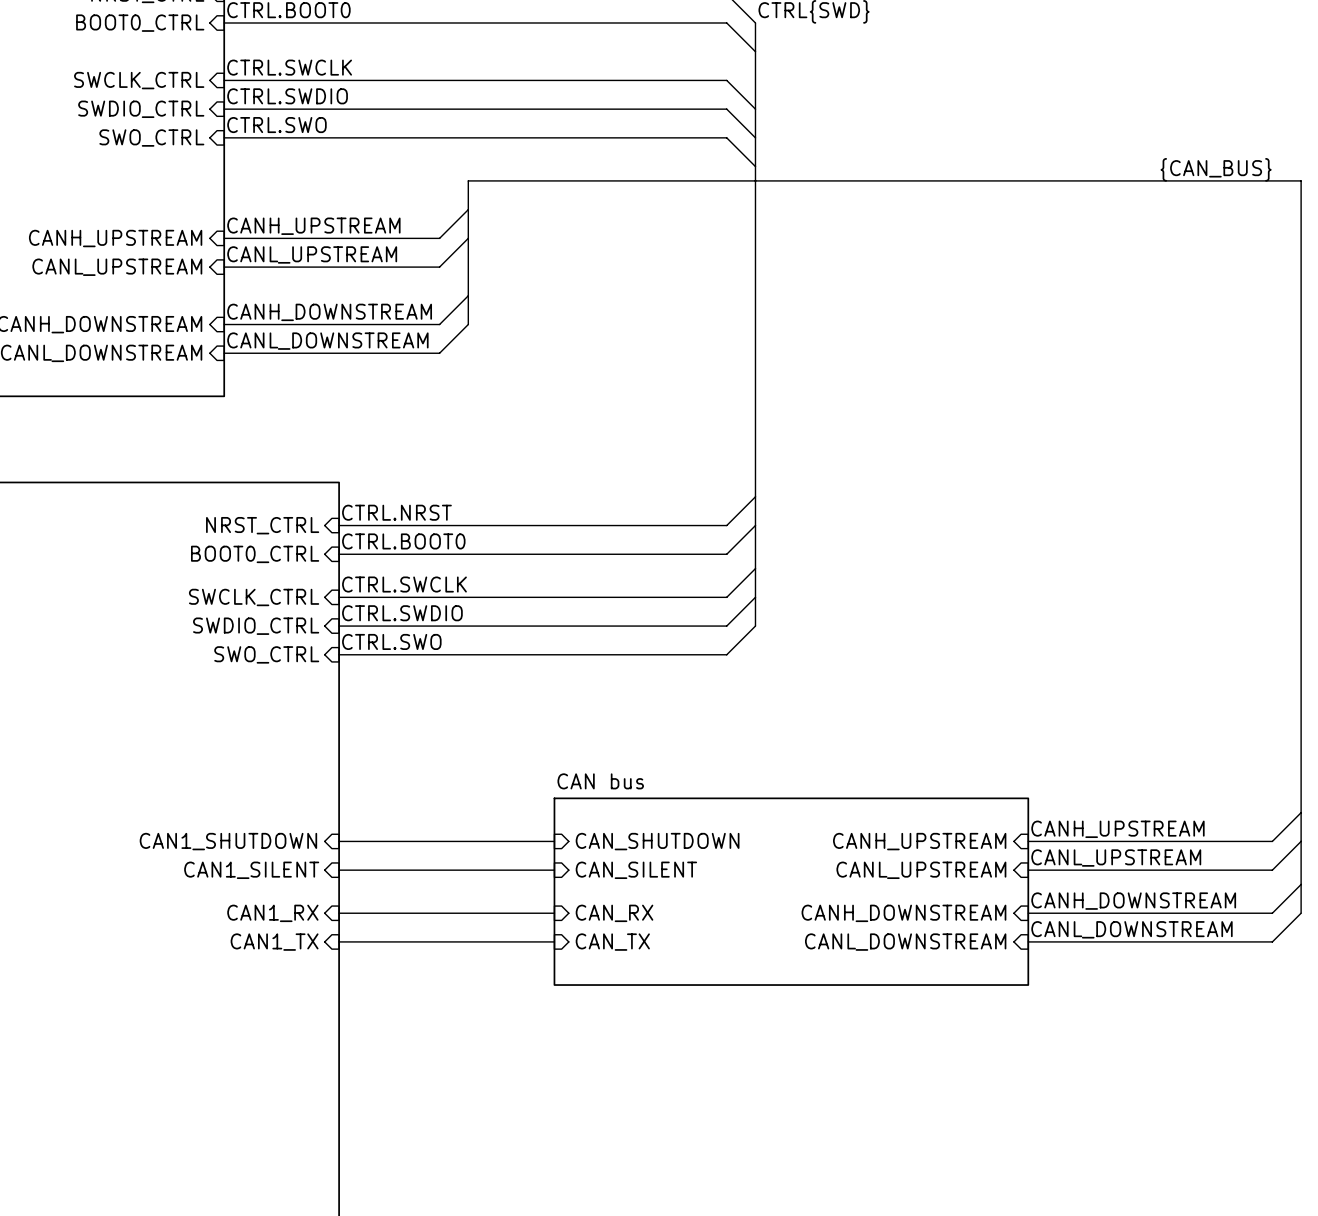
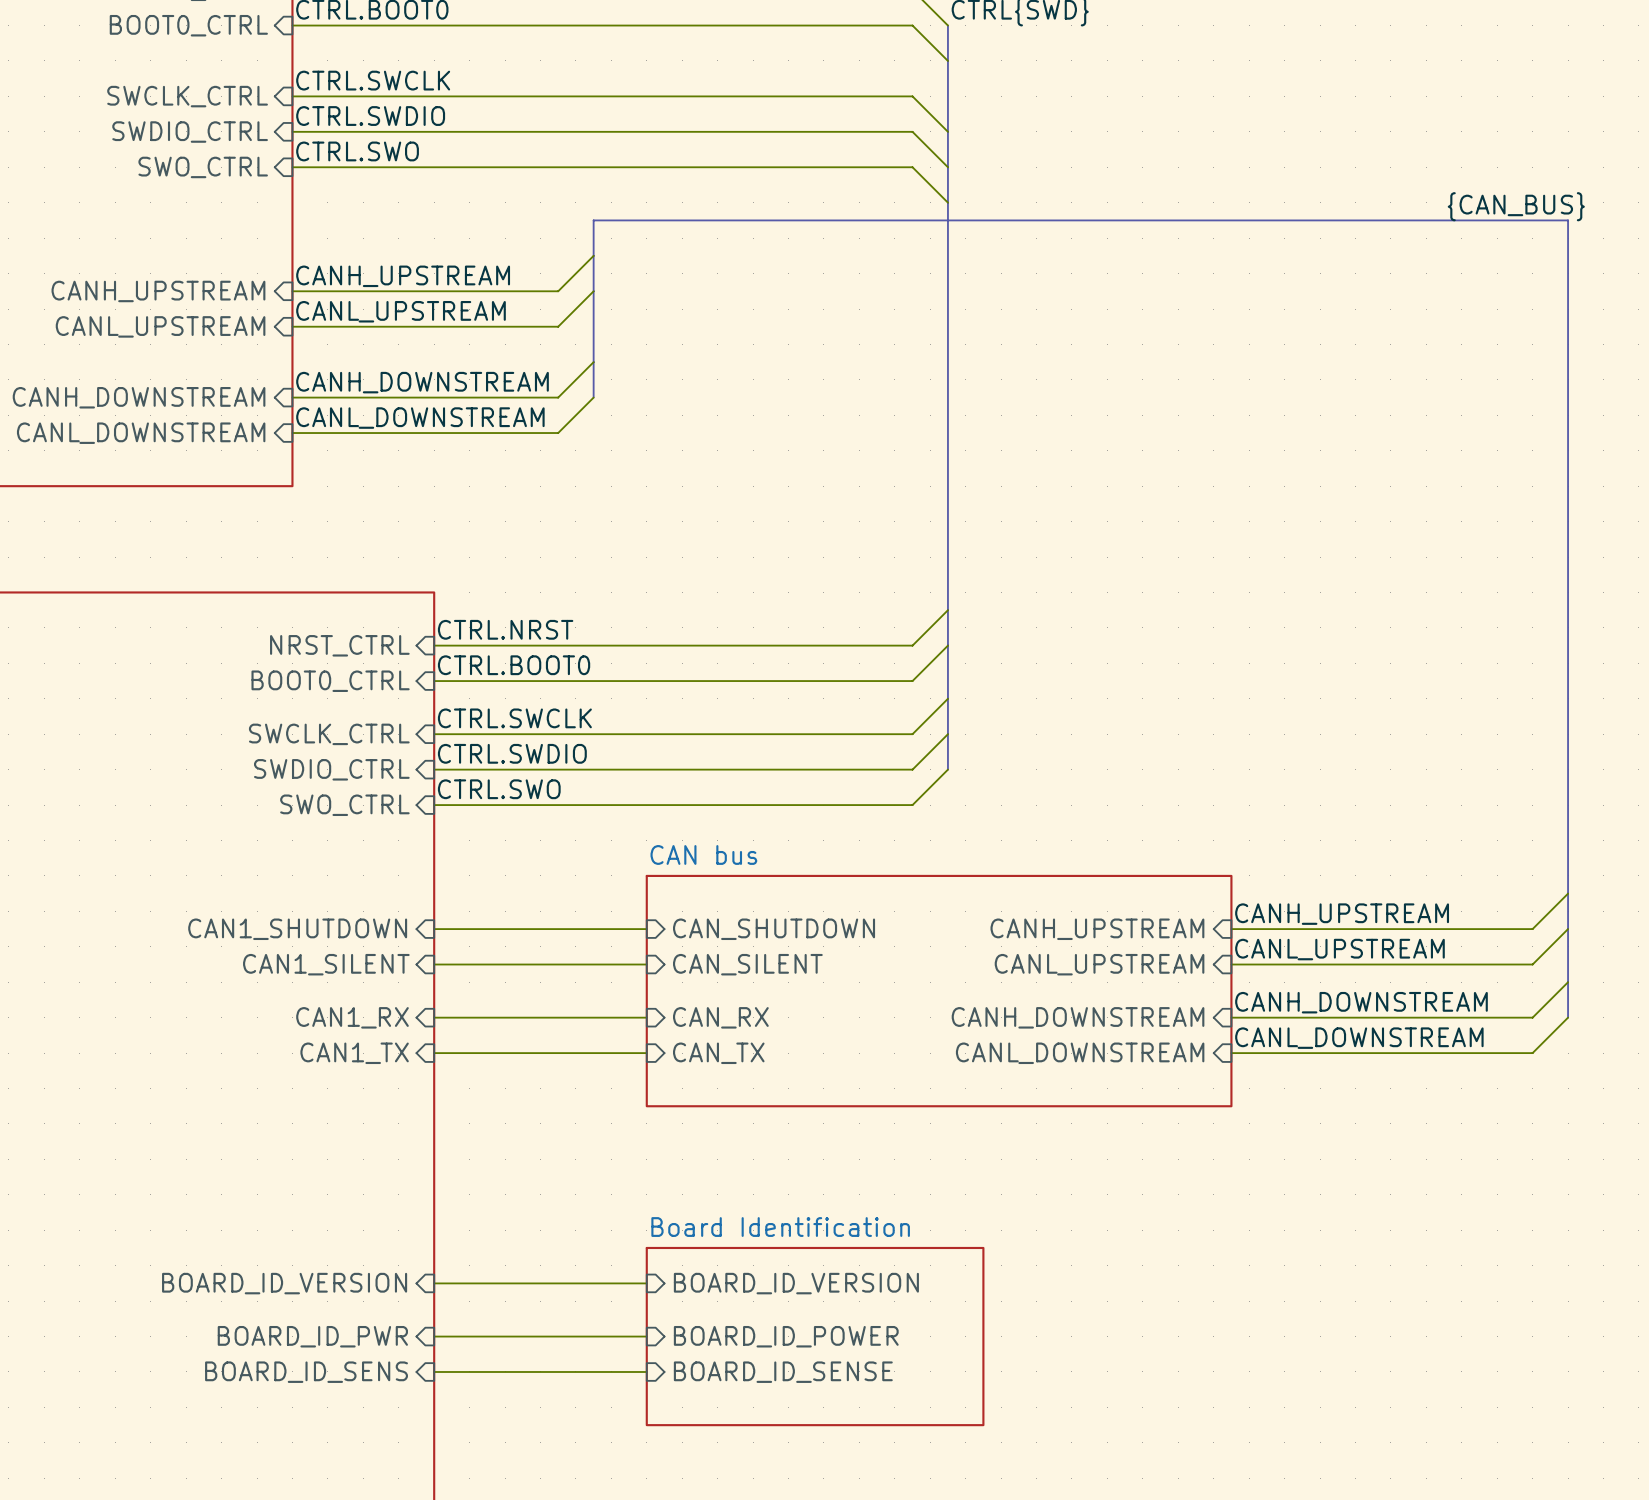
bus: (1258, 180) (1301, 180) (1301, 913) -> (1568, 220) (1568, 1017)
wire: none -> (434, 929) (646, 929)
wire: none -> (434, 964) (646, 964)
wire: (1301, 812) (1272, 841) (1028, 841) -> (1568, 893) (1532, 929) (1231, 929)
wire: none -> (434, 1017) (646, 1017)
label position: CANH_UPSTREAM (1117, 829) -> CANH_UPSTREAM (1342, 914)
sheet pin position: CAN1_SHUTDOWN (228, 841) -> CAN1_SHUTDOWN (297, 929)
wire: (339, 841) (554, 841) -> none
sheet pin position: CAN_SHUTDOWN (657, 841) -> CAN_SHUTDOWN (774, 929)
sheet pin position: CANH_UPSTREAM (919, 841) -> CANH_UPSTREAM (1097, 929)
wire: (1301, 841) (1272, 870) (1028, 870) -> (1568, 929) (1532, 964) (1231, 964)
wire: none -> (434, 1053) (646, 1053)
label position: CANL_UPSTREAM (1116, 858) -> CANL_UPSTREAM (1339, 949)
sheet pin position: CAN1_SILENT (251, 870) -> CAN1_SILENT (326, 964)
wire: (339, 870) (554, 870) -> none
sheet pin position: CAN_SILENT (636, 870) -> CAN_SILENT (747, 964)
sheet pin position: CANL_UPSTREAM (921, 870) -> CANL_UPSTREAM (1099, 964)
wire: (1301, 884) (1272, 913) (1028, 913) -> (1568, 982) (1532, 1017) (1231, 1017)
sheet CAN bus position: (791, 891) -> (939, 991)
label position: CANH_DOWNSTREAM (1133, 901) -> CANH_DOWNSTREAM (1361, 1002)
sheet pin position: CAN1_RX (272, 913) -> CAN1_RX (352, 1017)
wire: (339, 913) (554, 913) -> none
sheet pin position: CAN_RX (614, 913) -> CAN_RX (720, 1017)
sheet pin position: CANH_DOWNSTREAM (903, 913) -> CANH_DOWNSTREAM (1078, 1017)
wire: (1301, 913) (1272, 941) (1028, 941) -> (1568, 1017) (1532, 1053) (1231, 1053)
label position: CANL_DOWNSTREAM (1131, 929) -> CANL_DOWNSTREAM (1359, 1038)
wire: (339, 941) (554, 941) -> none
sheet pin position: CAN1_TX (274, 942) -> CAN1_TX (354, 1053)
sheet pin position: CAN_TX (612, 942) -> CAN_TX (718, 1053)
sheet pin position: CANL_DOWNSTREAM (905, 942) -> CANL_DOWNSTREAM (1080, 1053)
sheet pin: none -> BOARD_ID_VERSION (284, 1283)
wire: none -> (434, 1283) (646, 1283)
sheet pin: none -> BOARD_ID_VERSION (796, 1283)
sheet pin: none -> BOARD_ID_PWR (312, 1336)
wire: none -> (434, 1336) (646, 1336)
sheet pin: none -> BOARD_ID_POWER (786, 1336)
sheet Board Identification: none -> (815, 1336)
sheet pin: none -> BOARD_ID_SENS (306, 1372)
wire: none -> (434, 1371) (646, 1371)
sheet pin: none -> BOARD_ID_SENSE (783, 1372)

